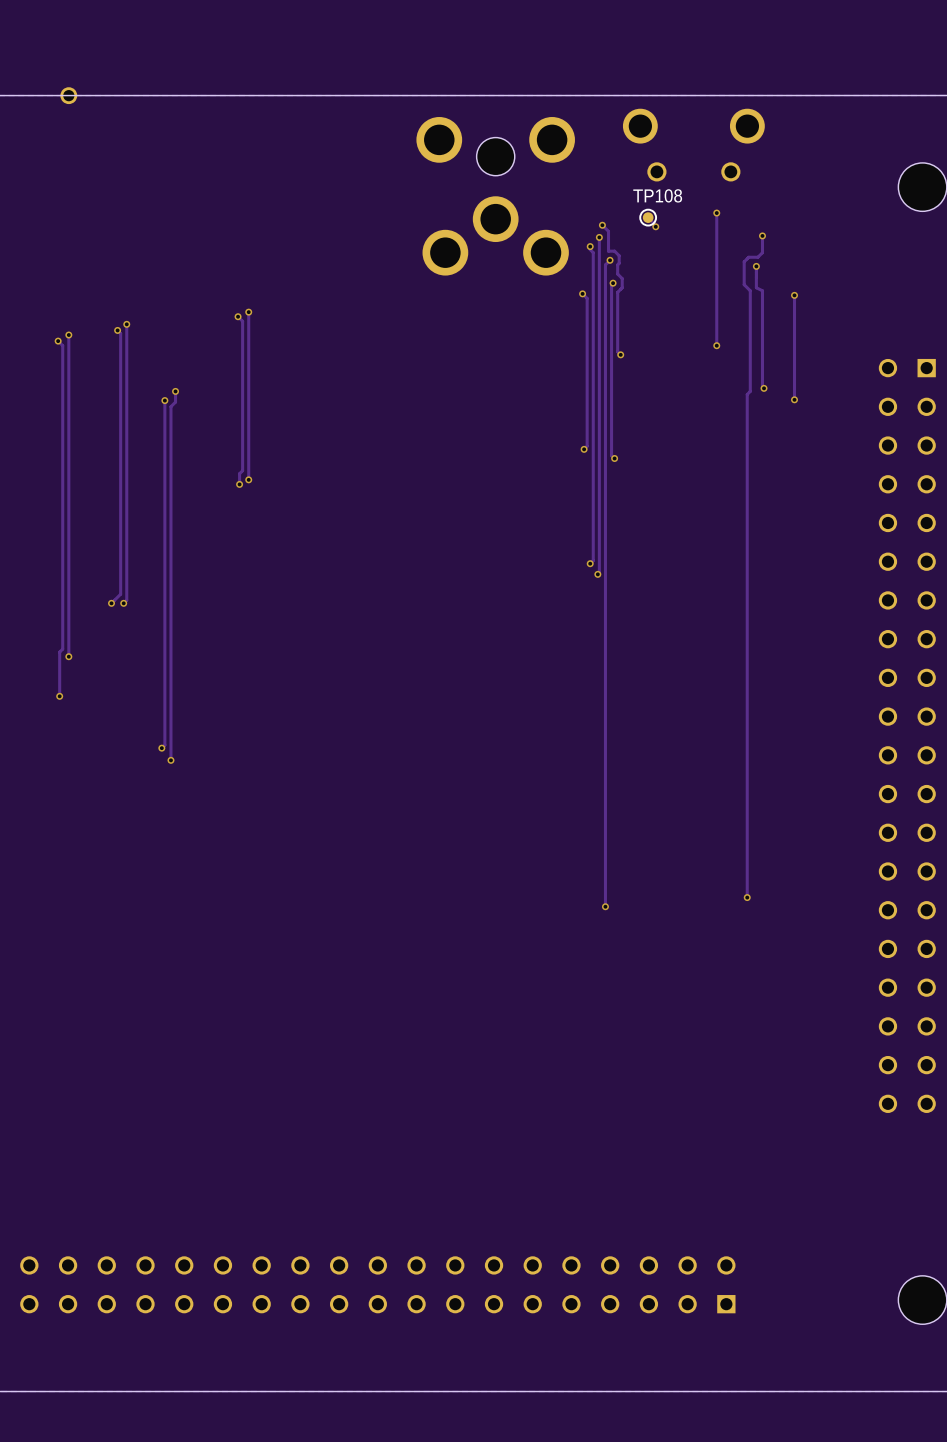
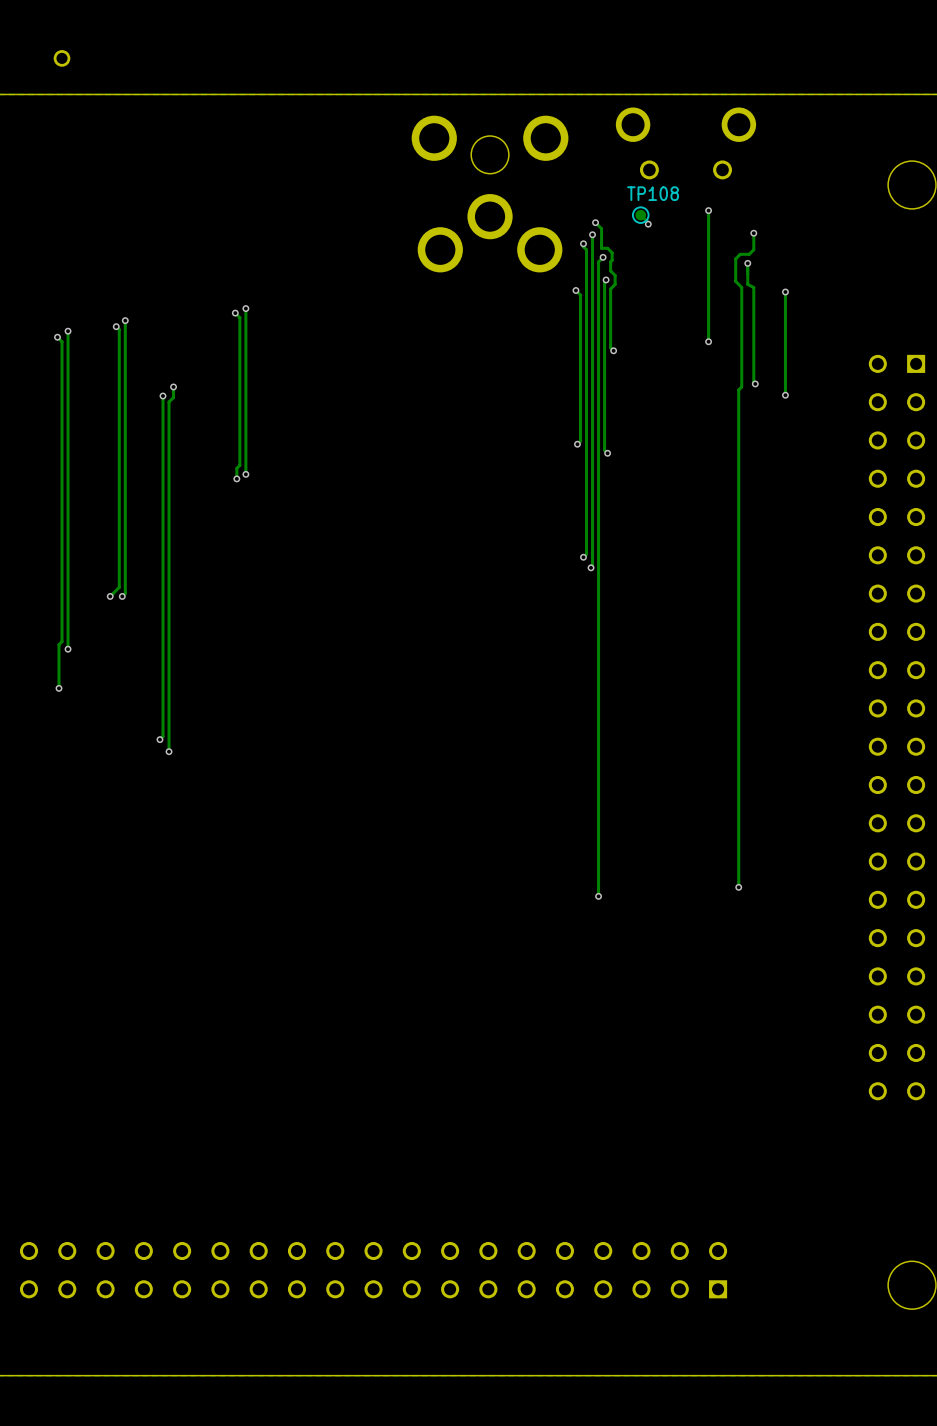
part position: (68, 95) -> (62, 58)

